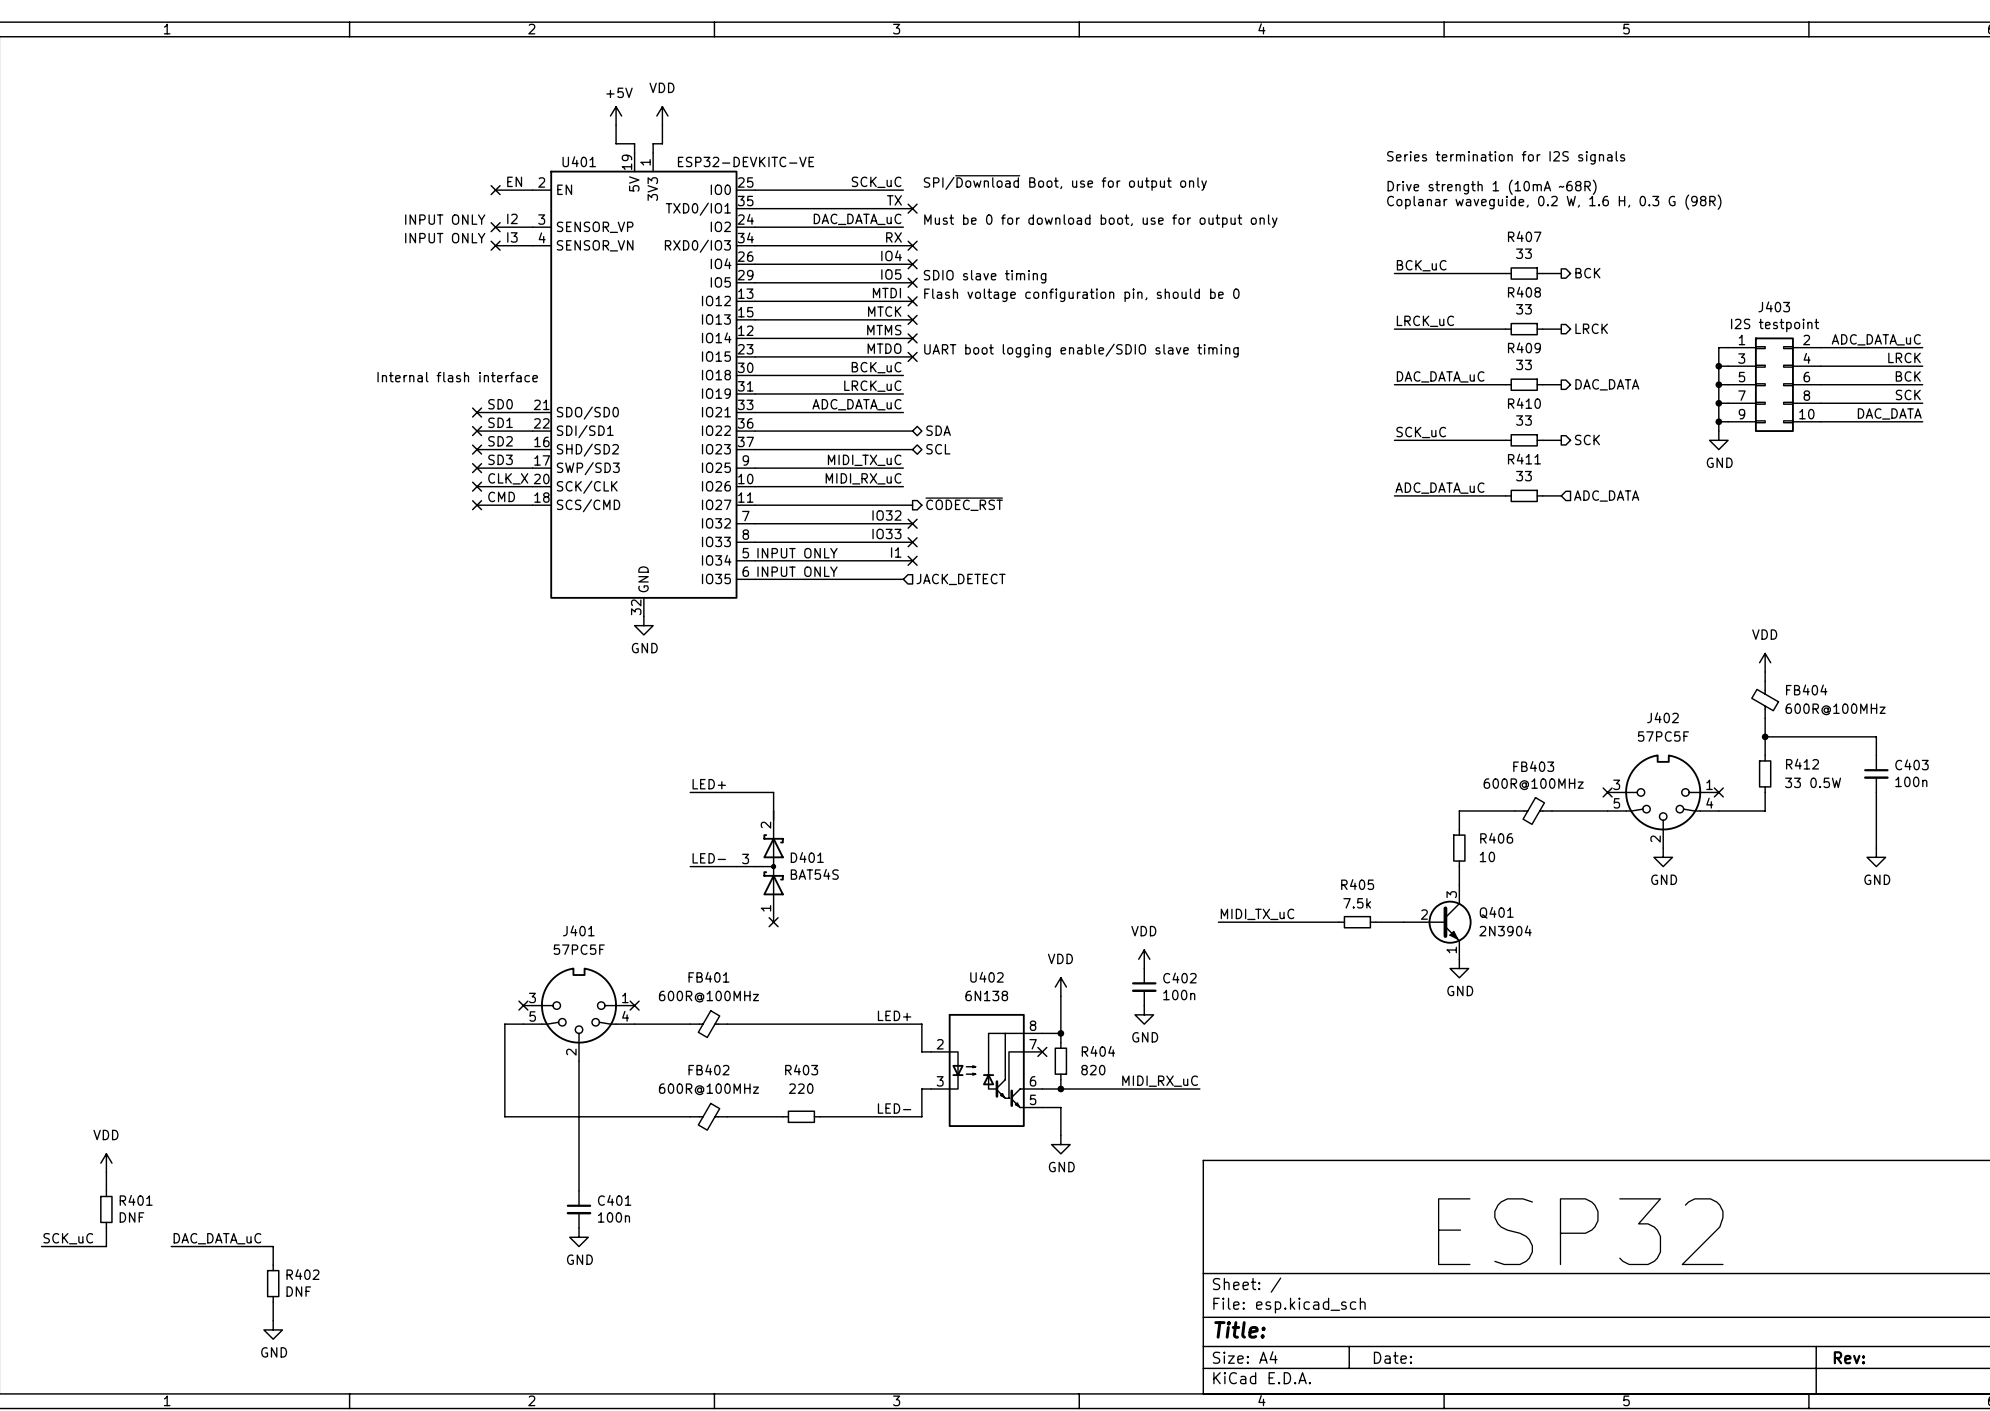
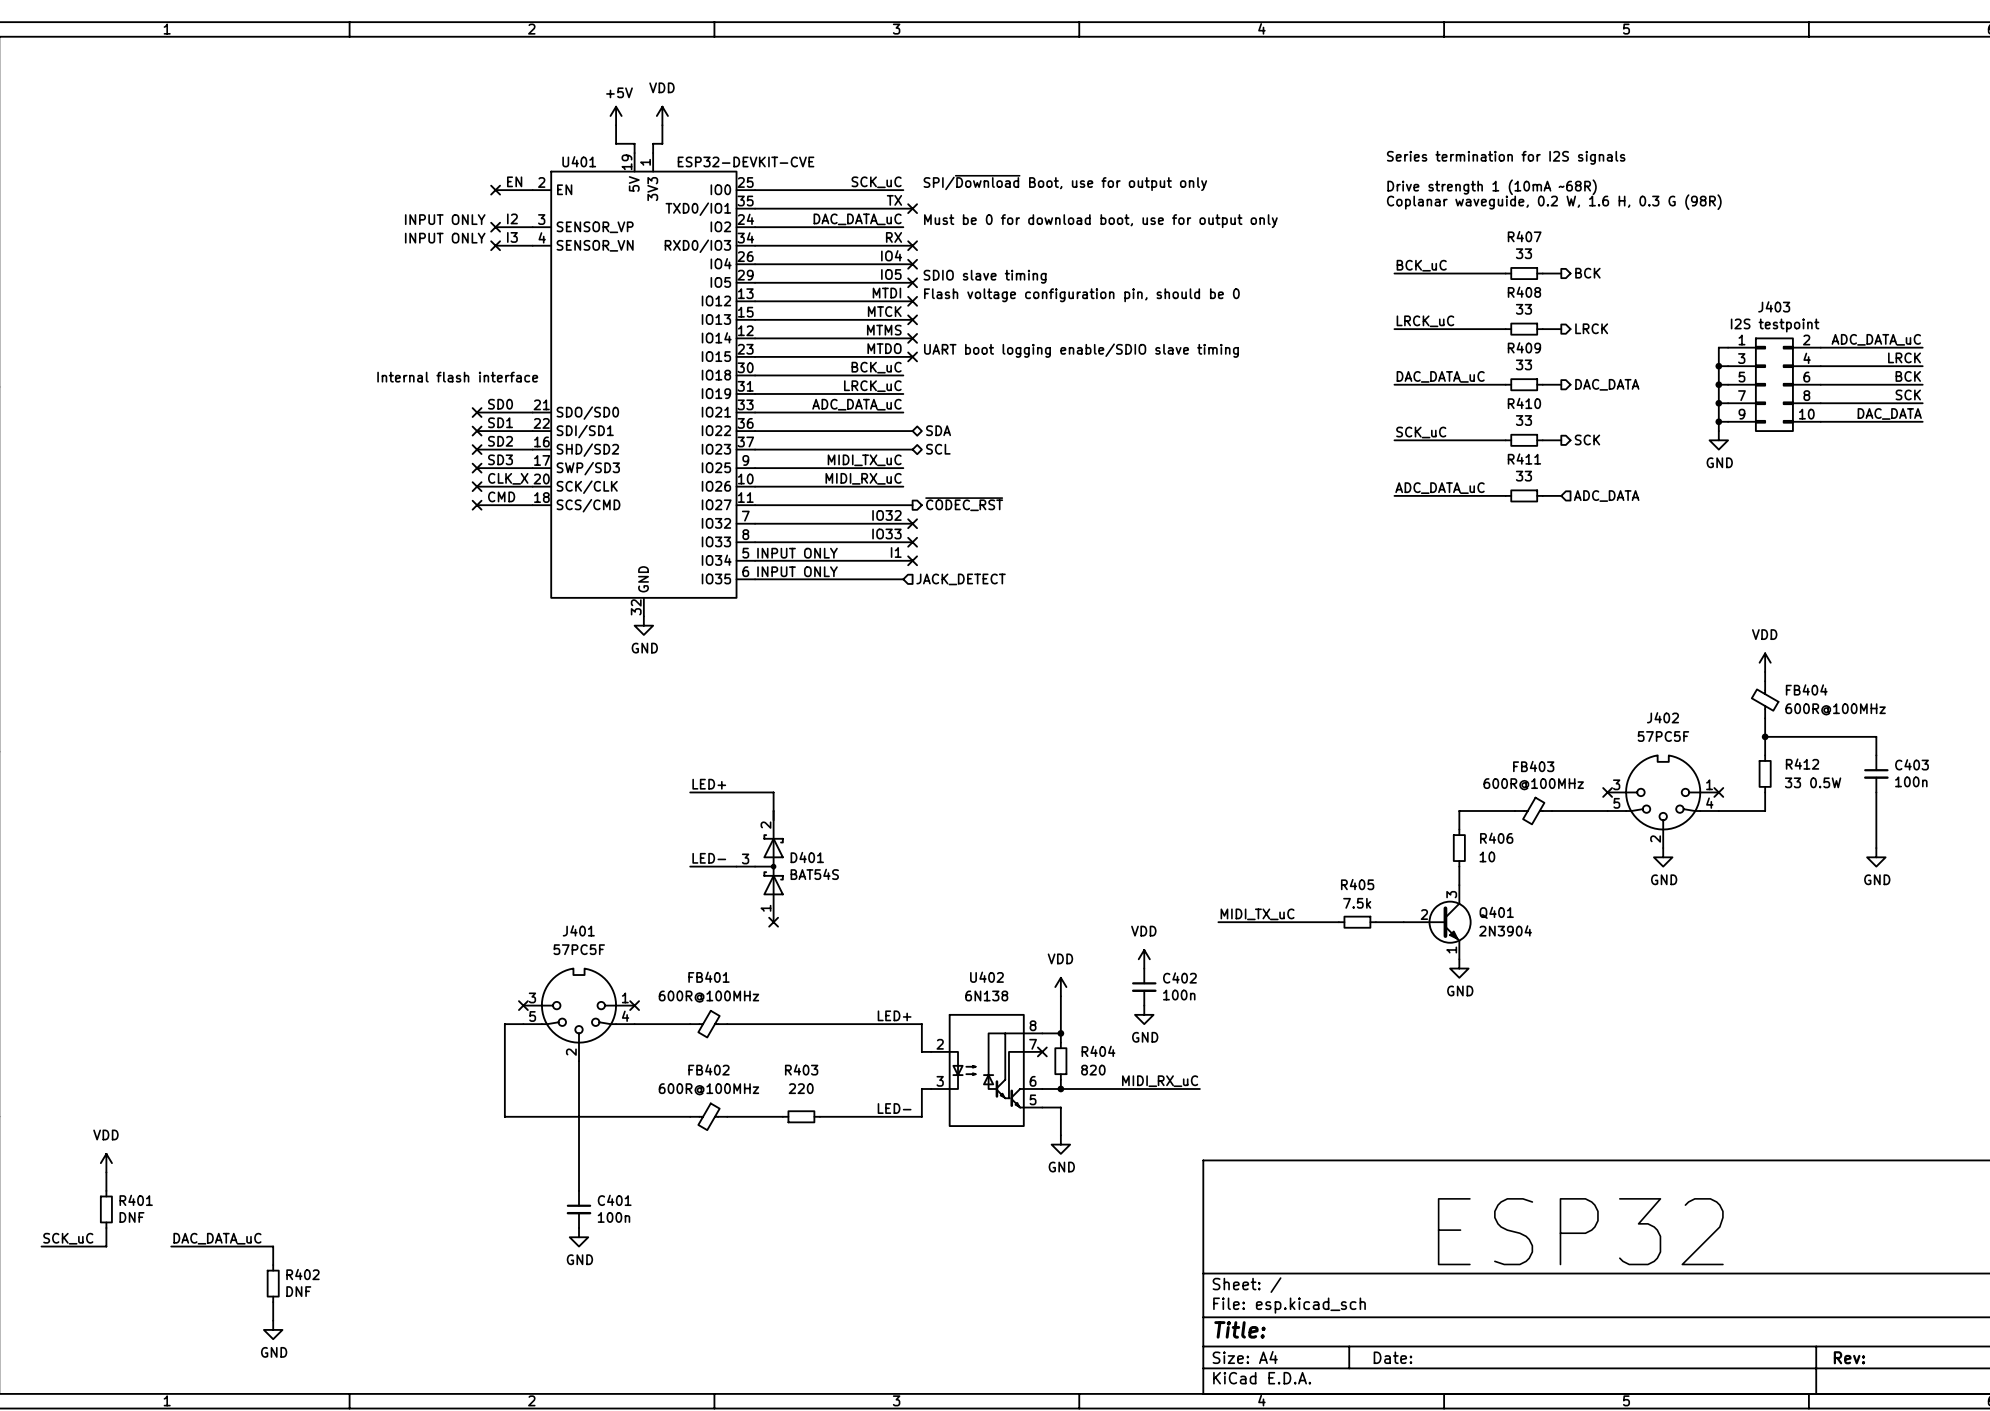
U401 value: ESP32-DEVKITC-VE (746, 161) -> ESP32-DEVKIT-CVE (746, 161)

